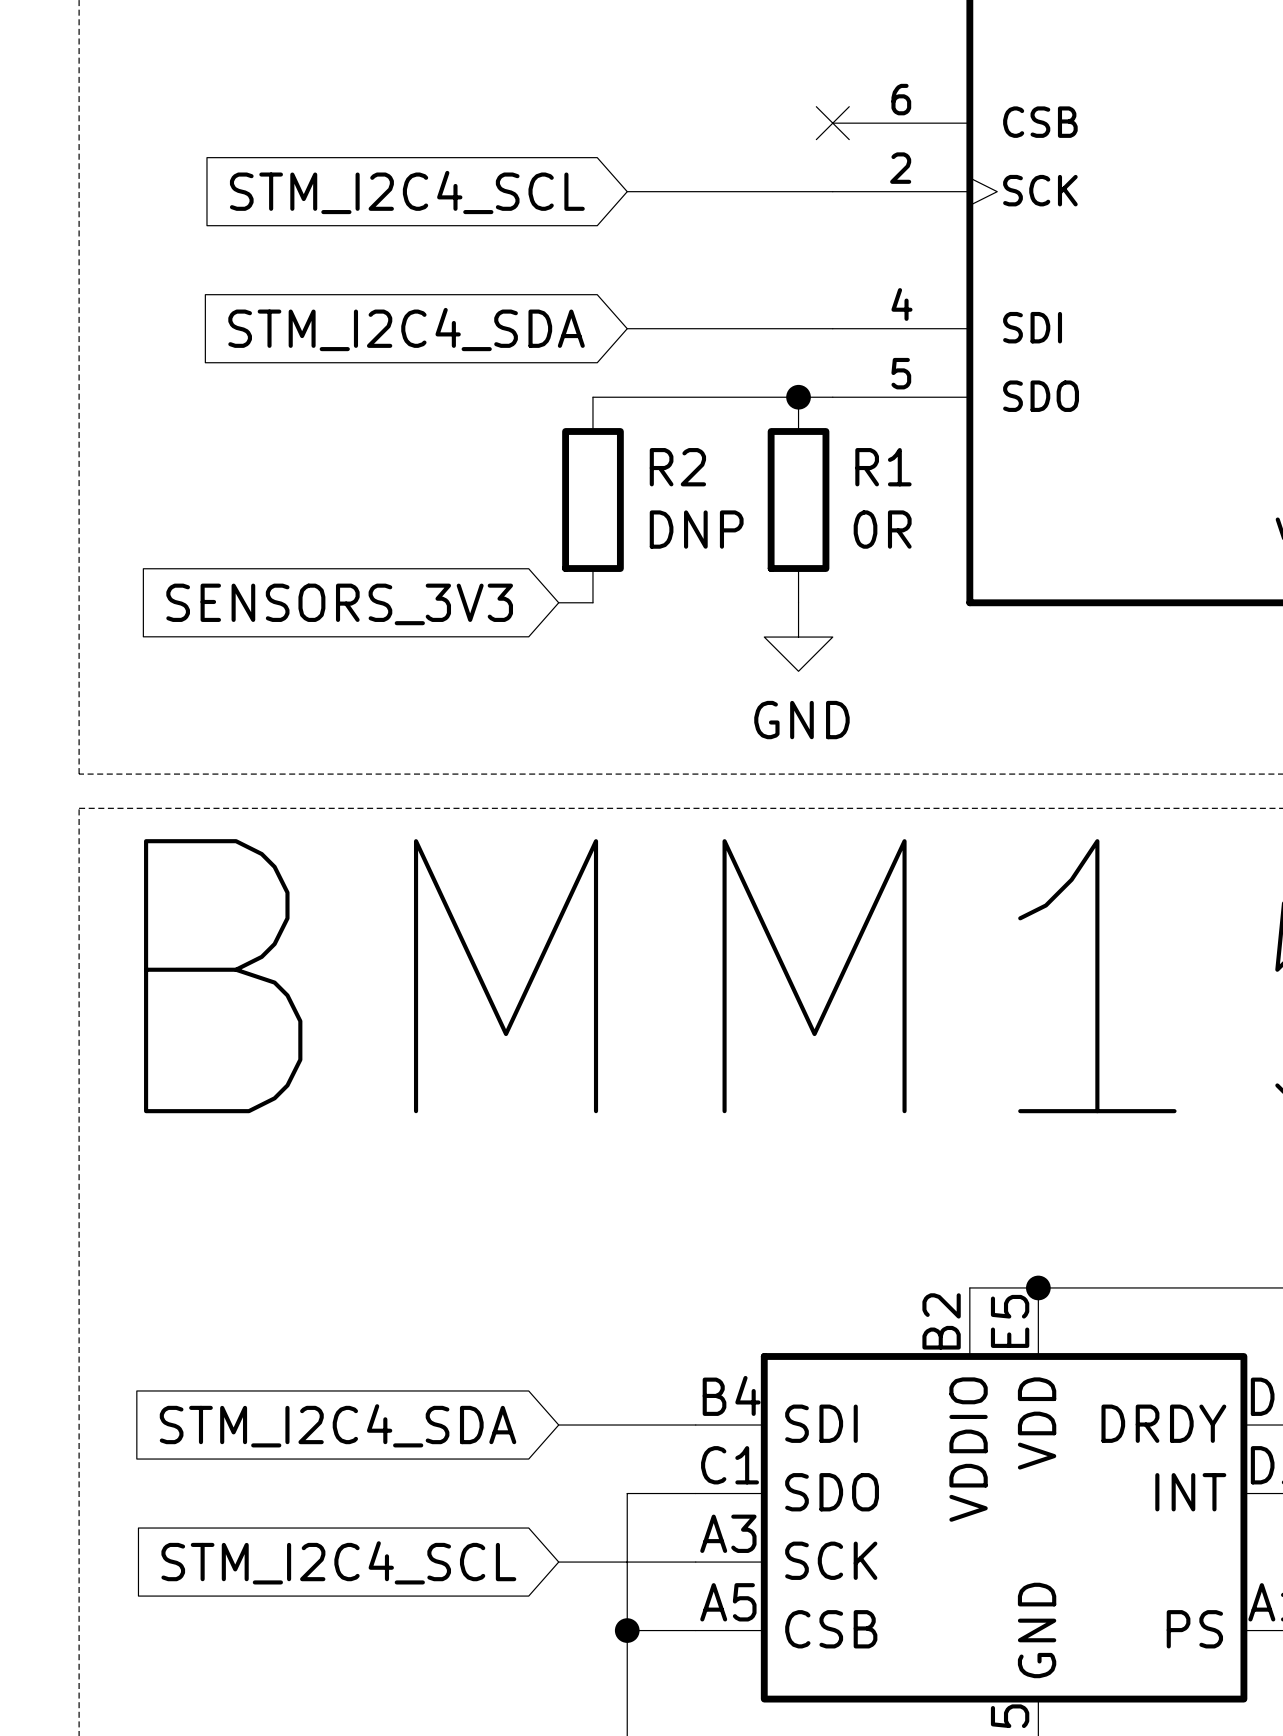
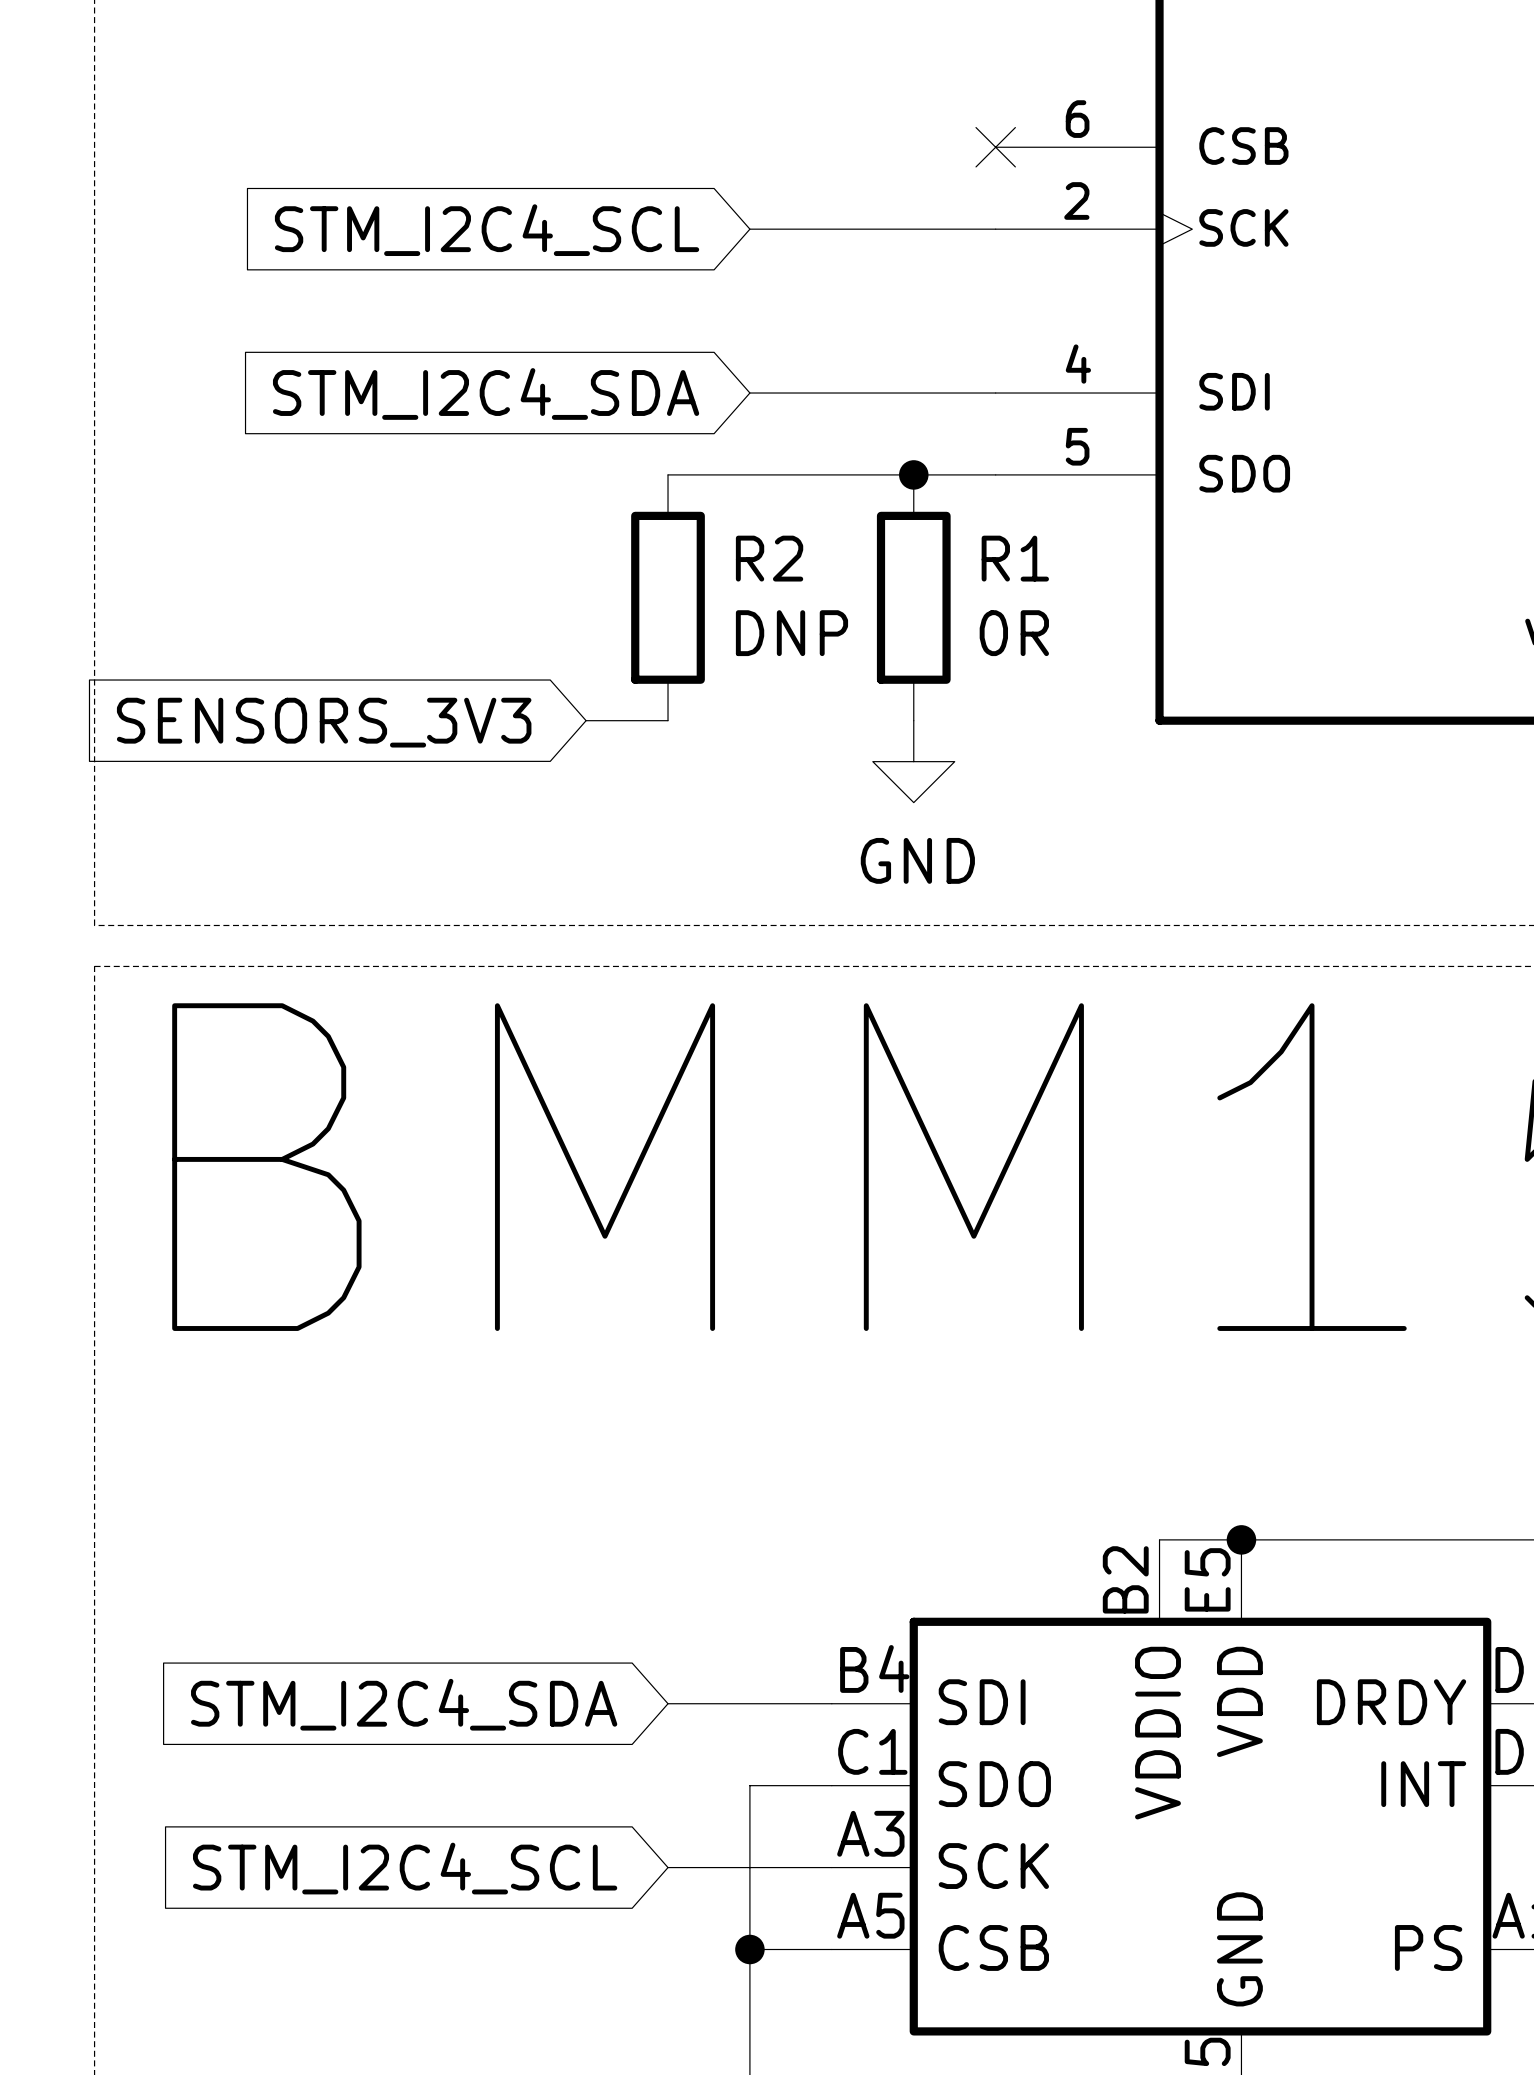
wire: none -> (668, 474) (708, 474)
junction position: (798, 397) -> (913, 474)
R2 position: (592, 500) -> (668, 597)
R1 position: (798, 500) -> (913, 597)
wire: (558, 602) (592, 602) -> (668, 720) (586, 720)
global label position: SENSORS_3V3 (339, 604) -> SENSORS_3V3 (324, 722)
power symbol position: GND (798, 637) -> GND (913, 761)

